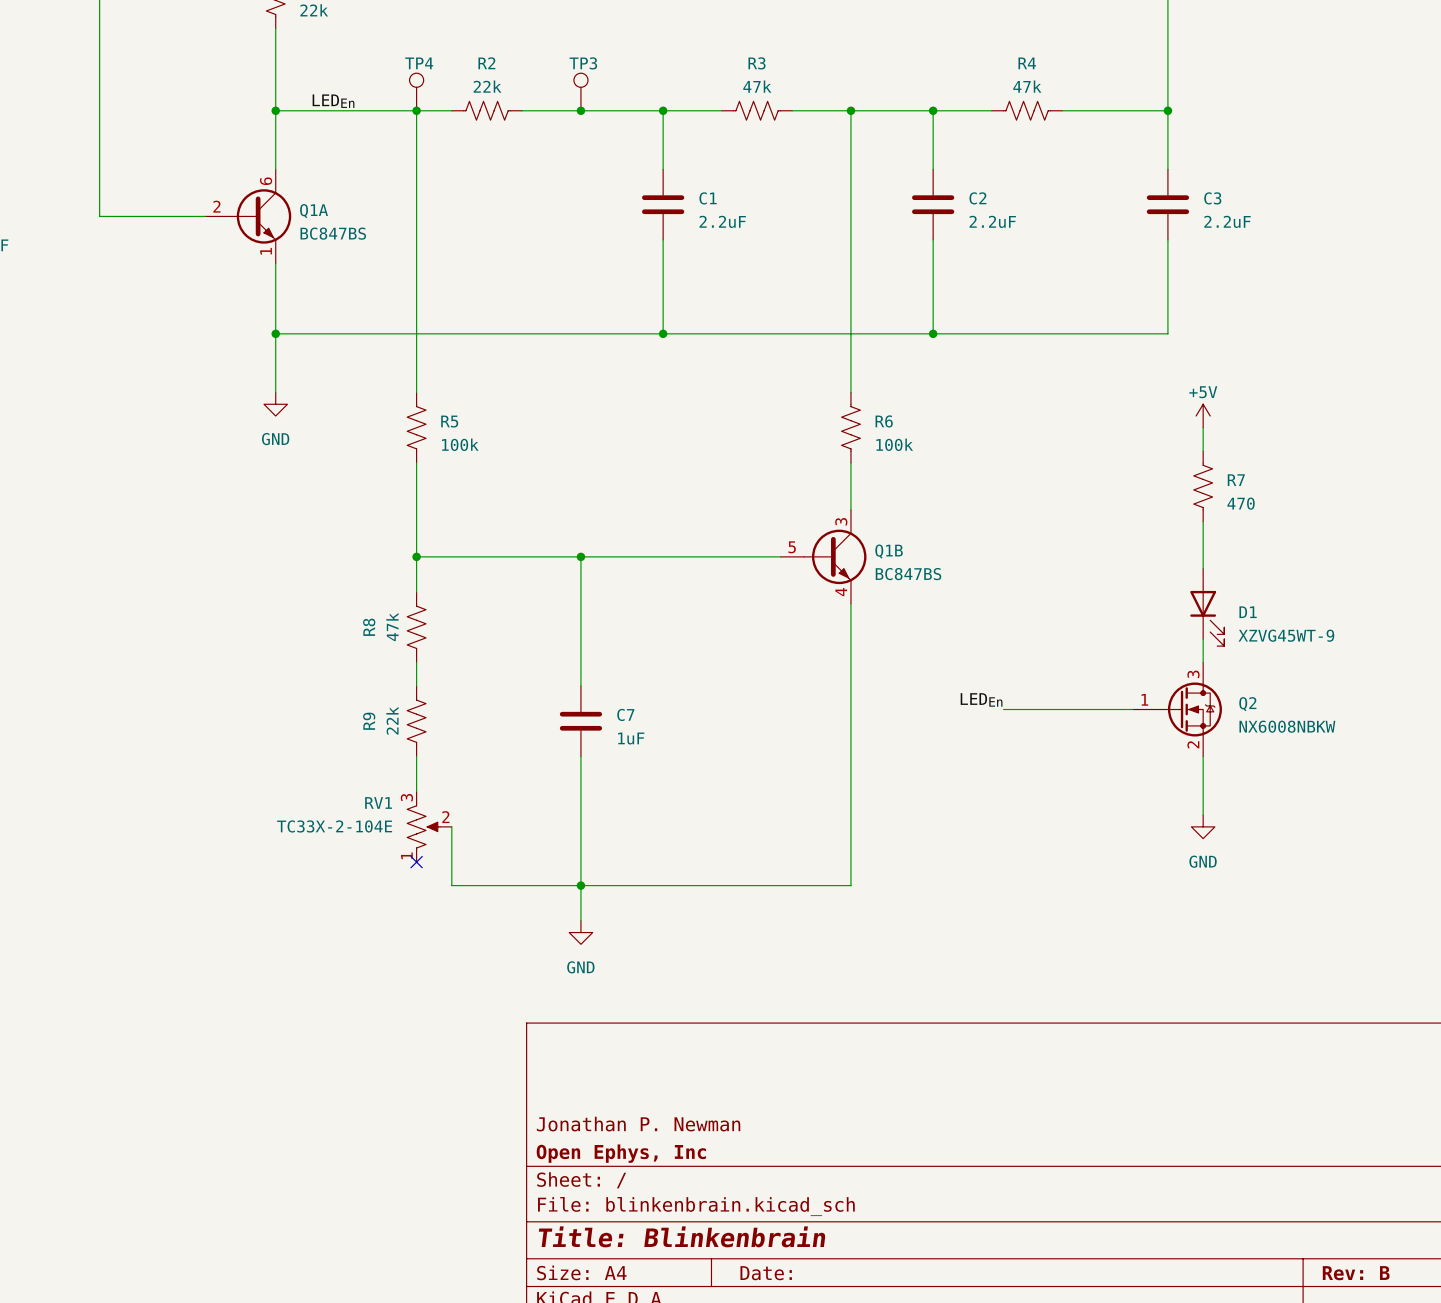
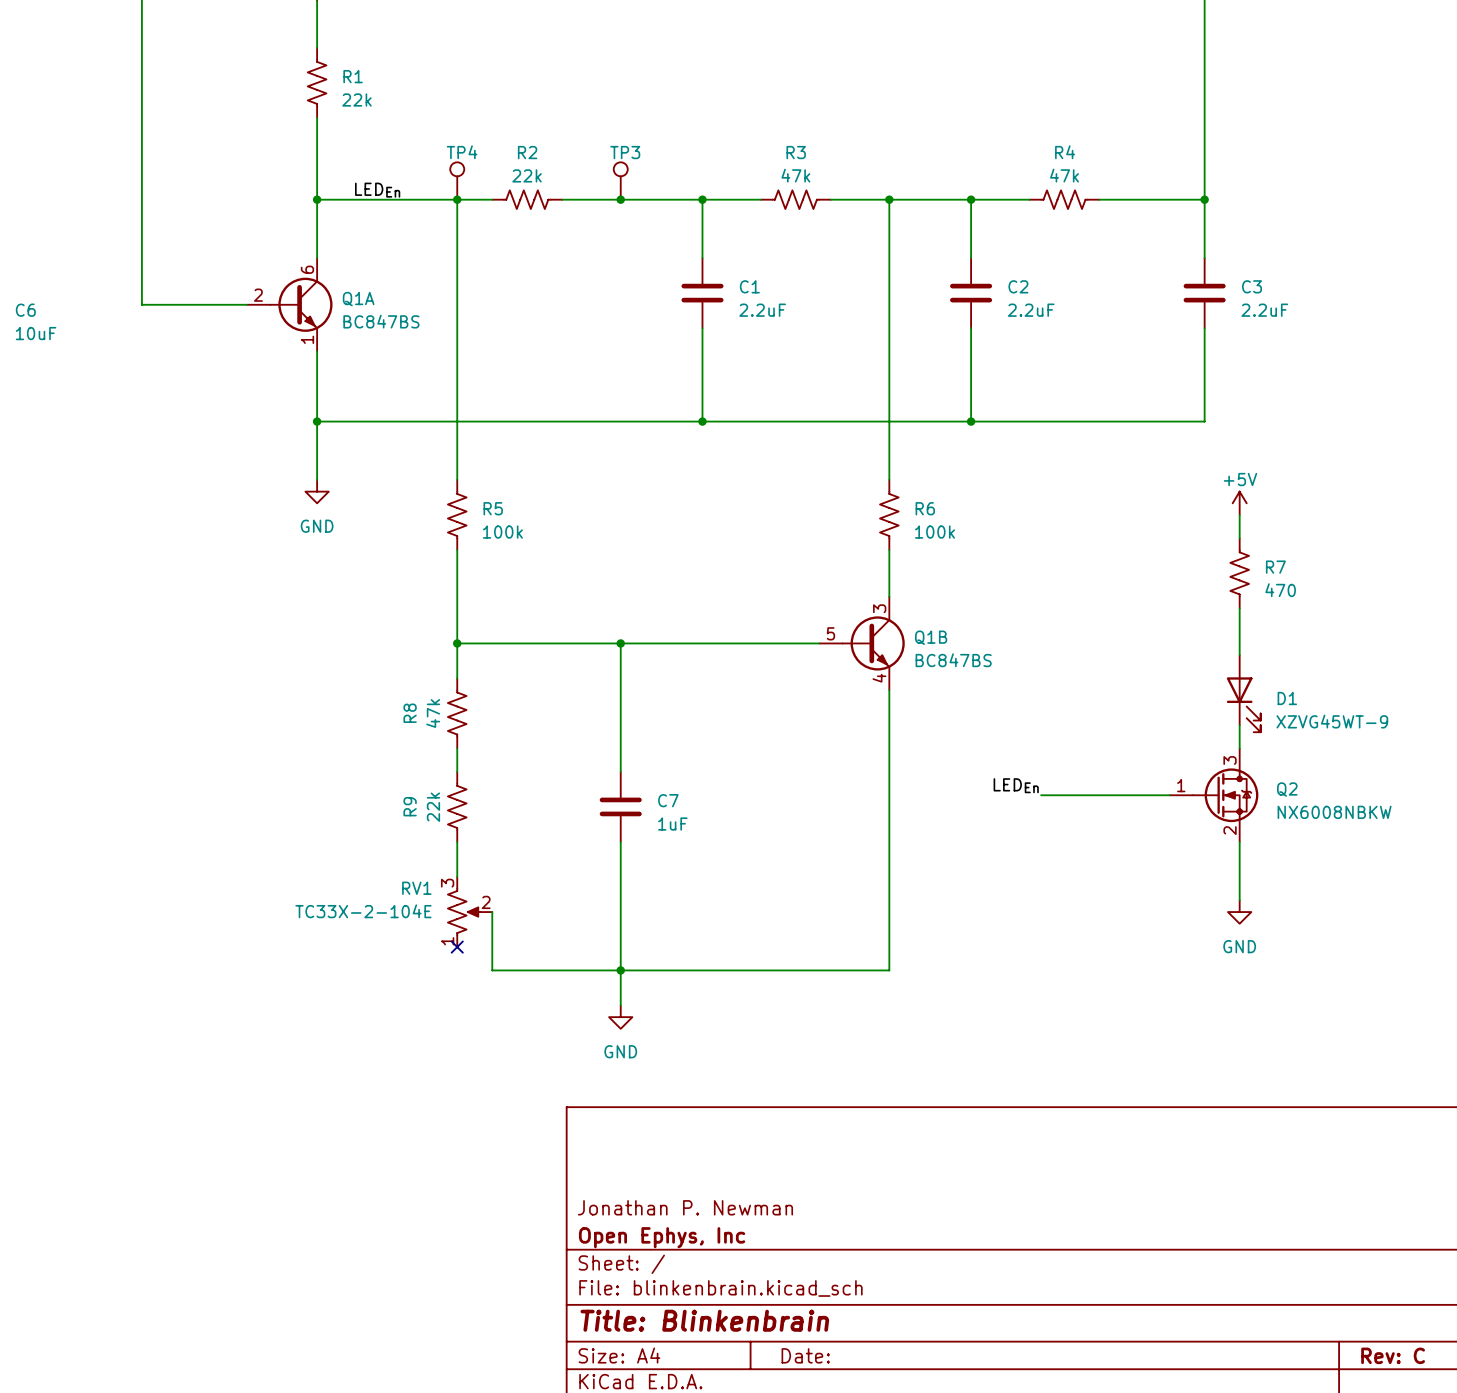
title block: Rev: B (1356, 1273) -> Rev: C (1393, 1355)

